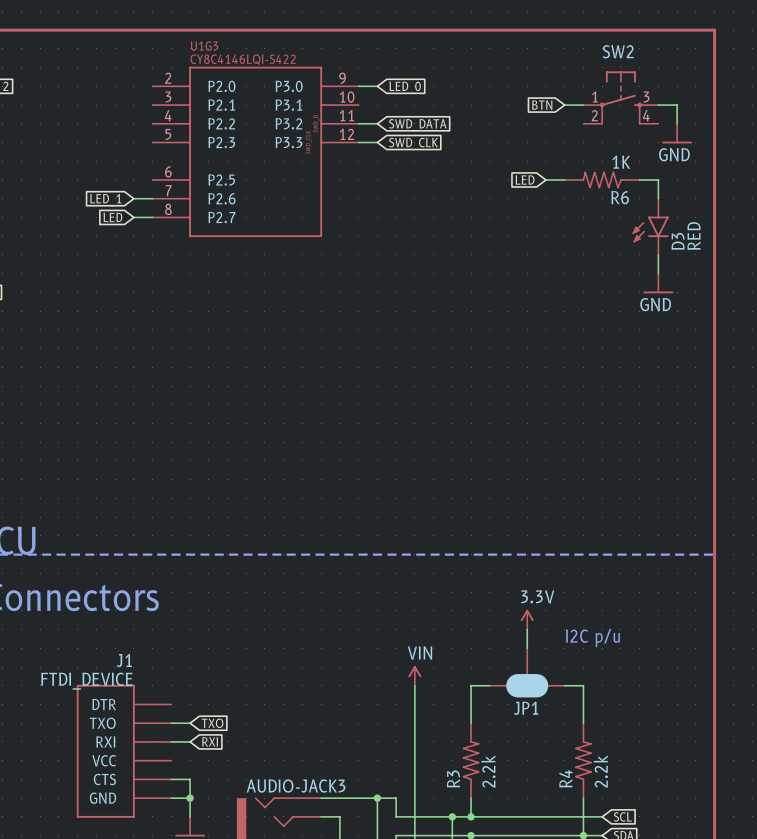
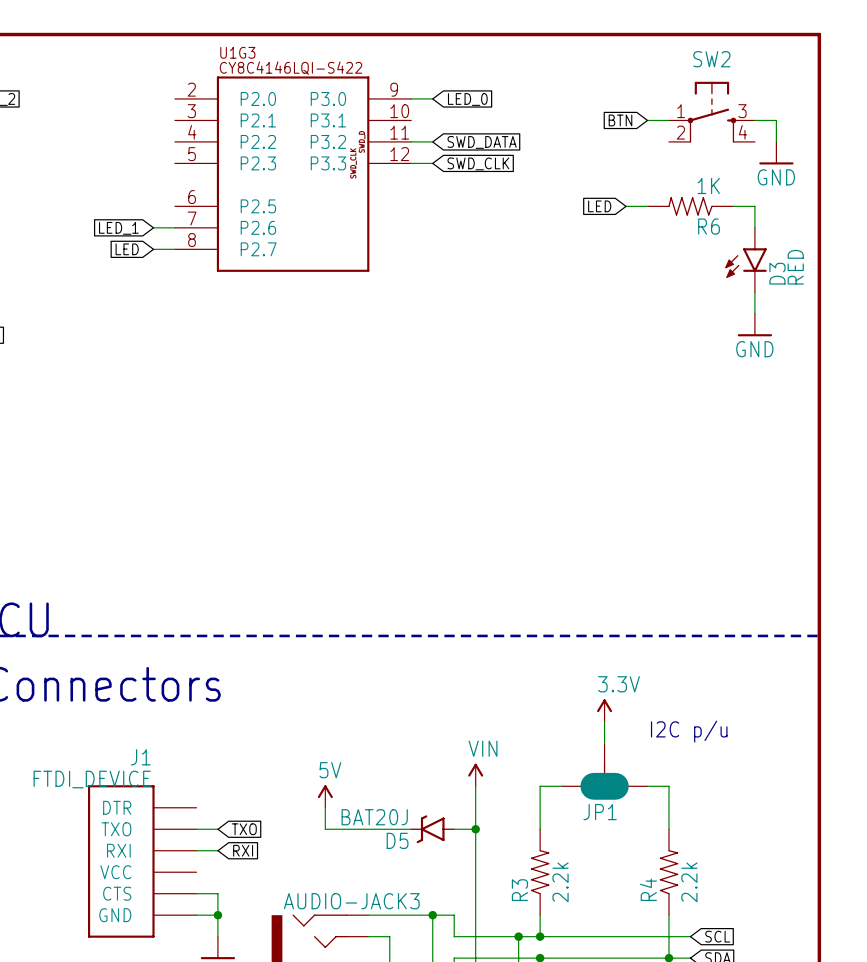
power symbol: none -> 5V (325, 796)
wire: none -> (325, 807) (325, 829) (411, 829)
D5: none -> BAT20J (432, 829)
wire: none -> (454, 829) (475, 829)
junction: none -> (475, 829)

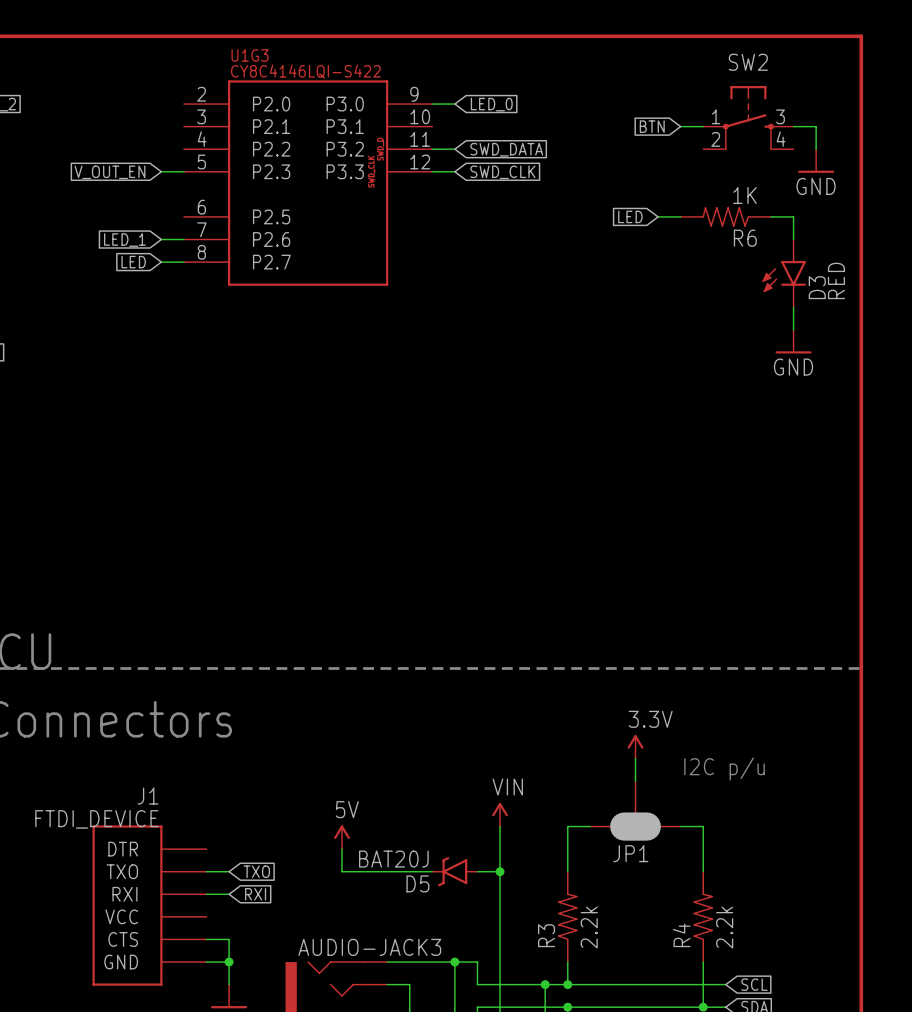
global label: none -> V_OUT_EN (109, 172)
wire: none -> (161, 171) (183, 171)

